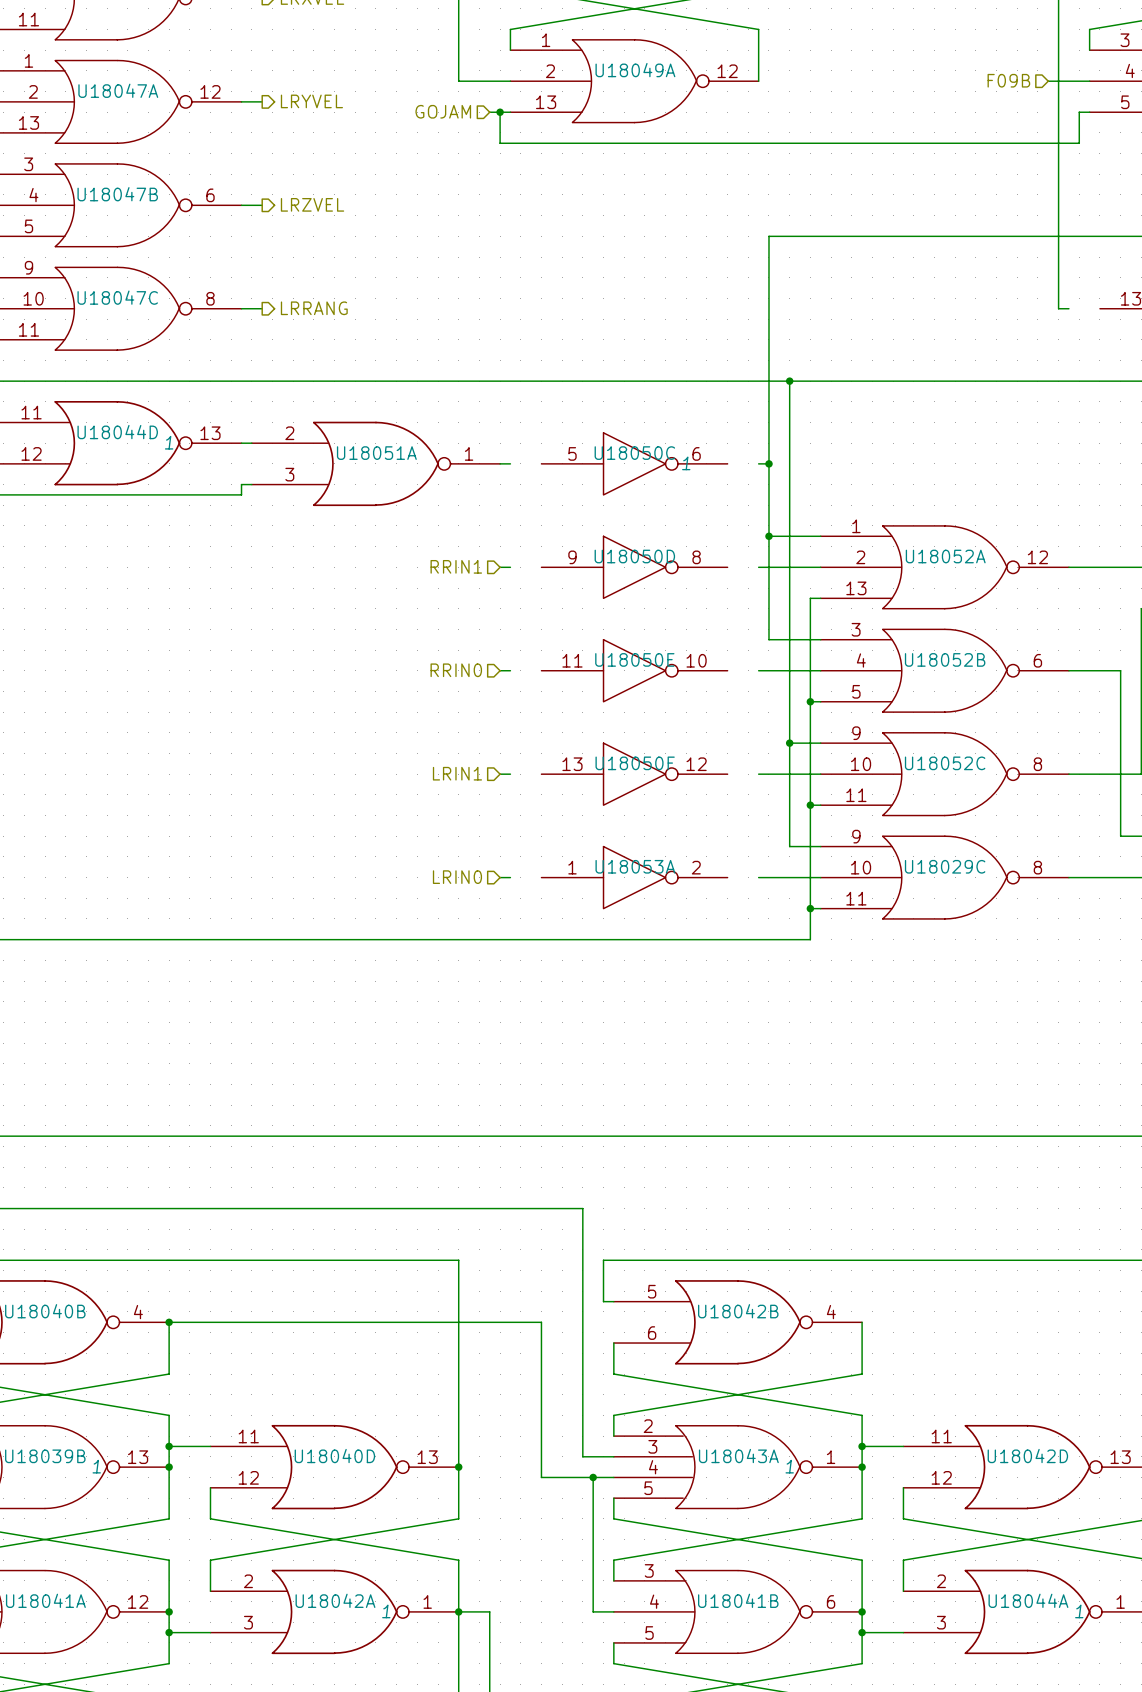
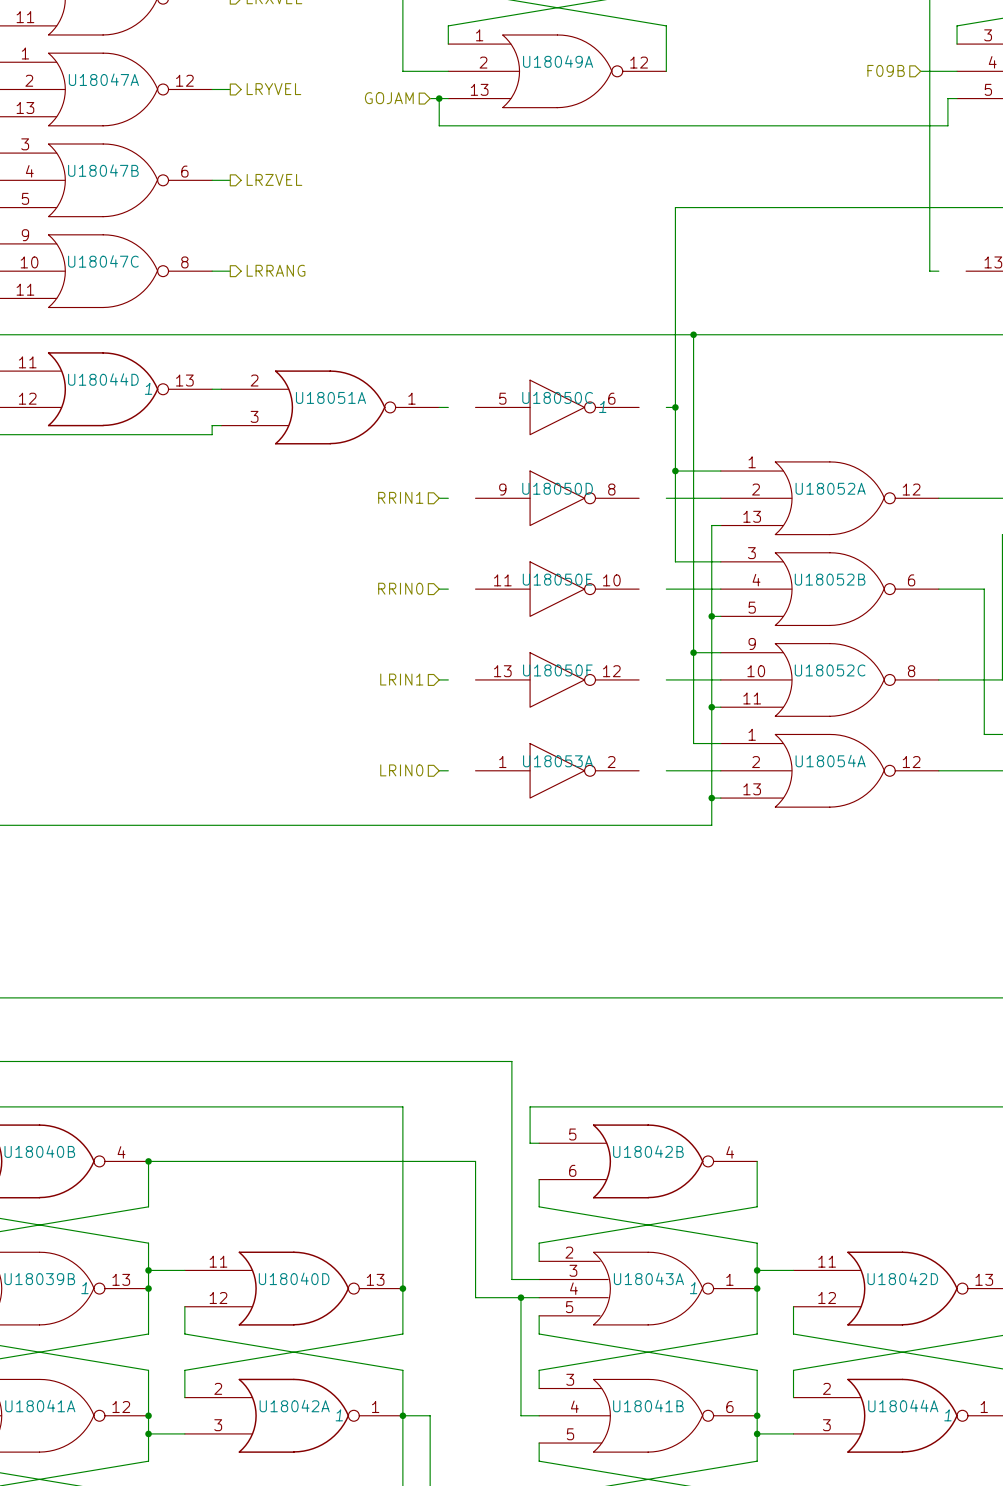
U18029C pin number: 9 (856, 836) -> 1 (752, 734)
U18029C name: U18029C (945, 866) -> U18054A (830, 761)
U18029C pin number: 10 (861, 867) -> 2 (756, 762)
U18029C pin number: 8 (1037, 867) -> 12 (911, 762)
U18029C pin number: 11 (856, 898) -> 13 (752, 789)

